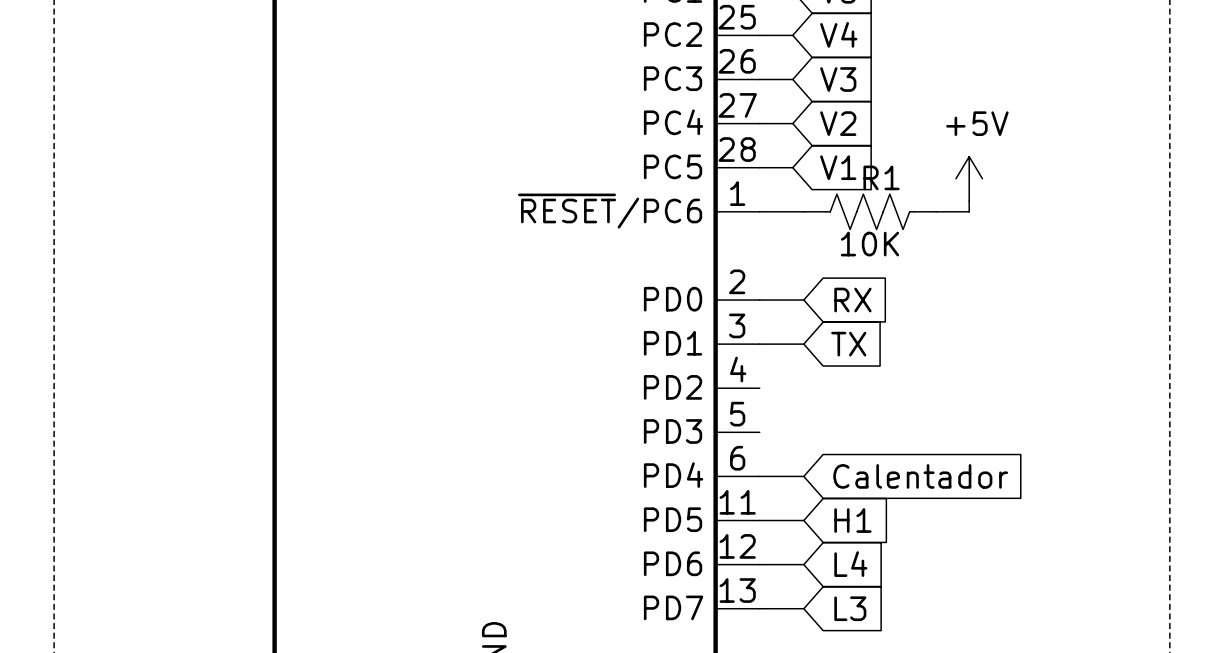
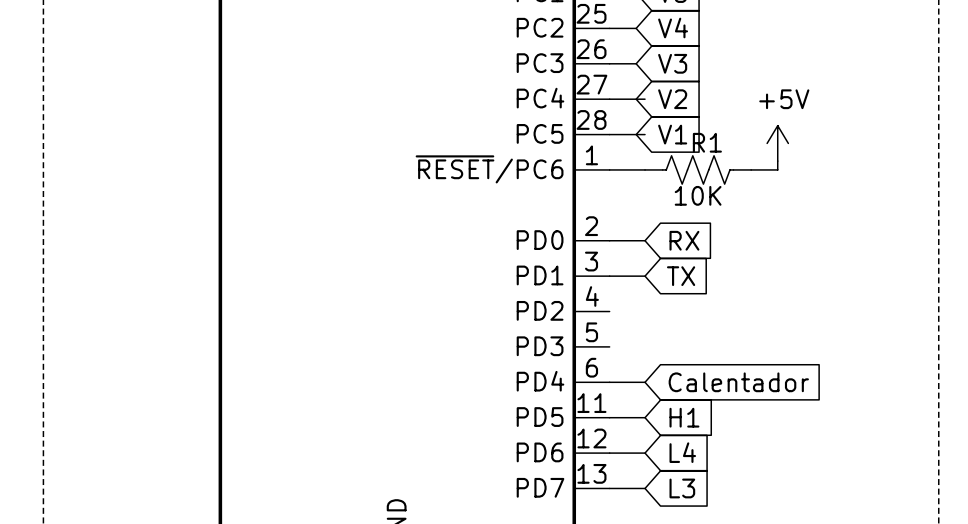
wire: none -> (636, 99) (645, 99)
wire: none -> (636, 134) (645, 134)

